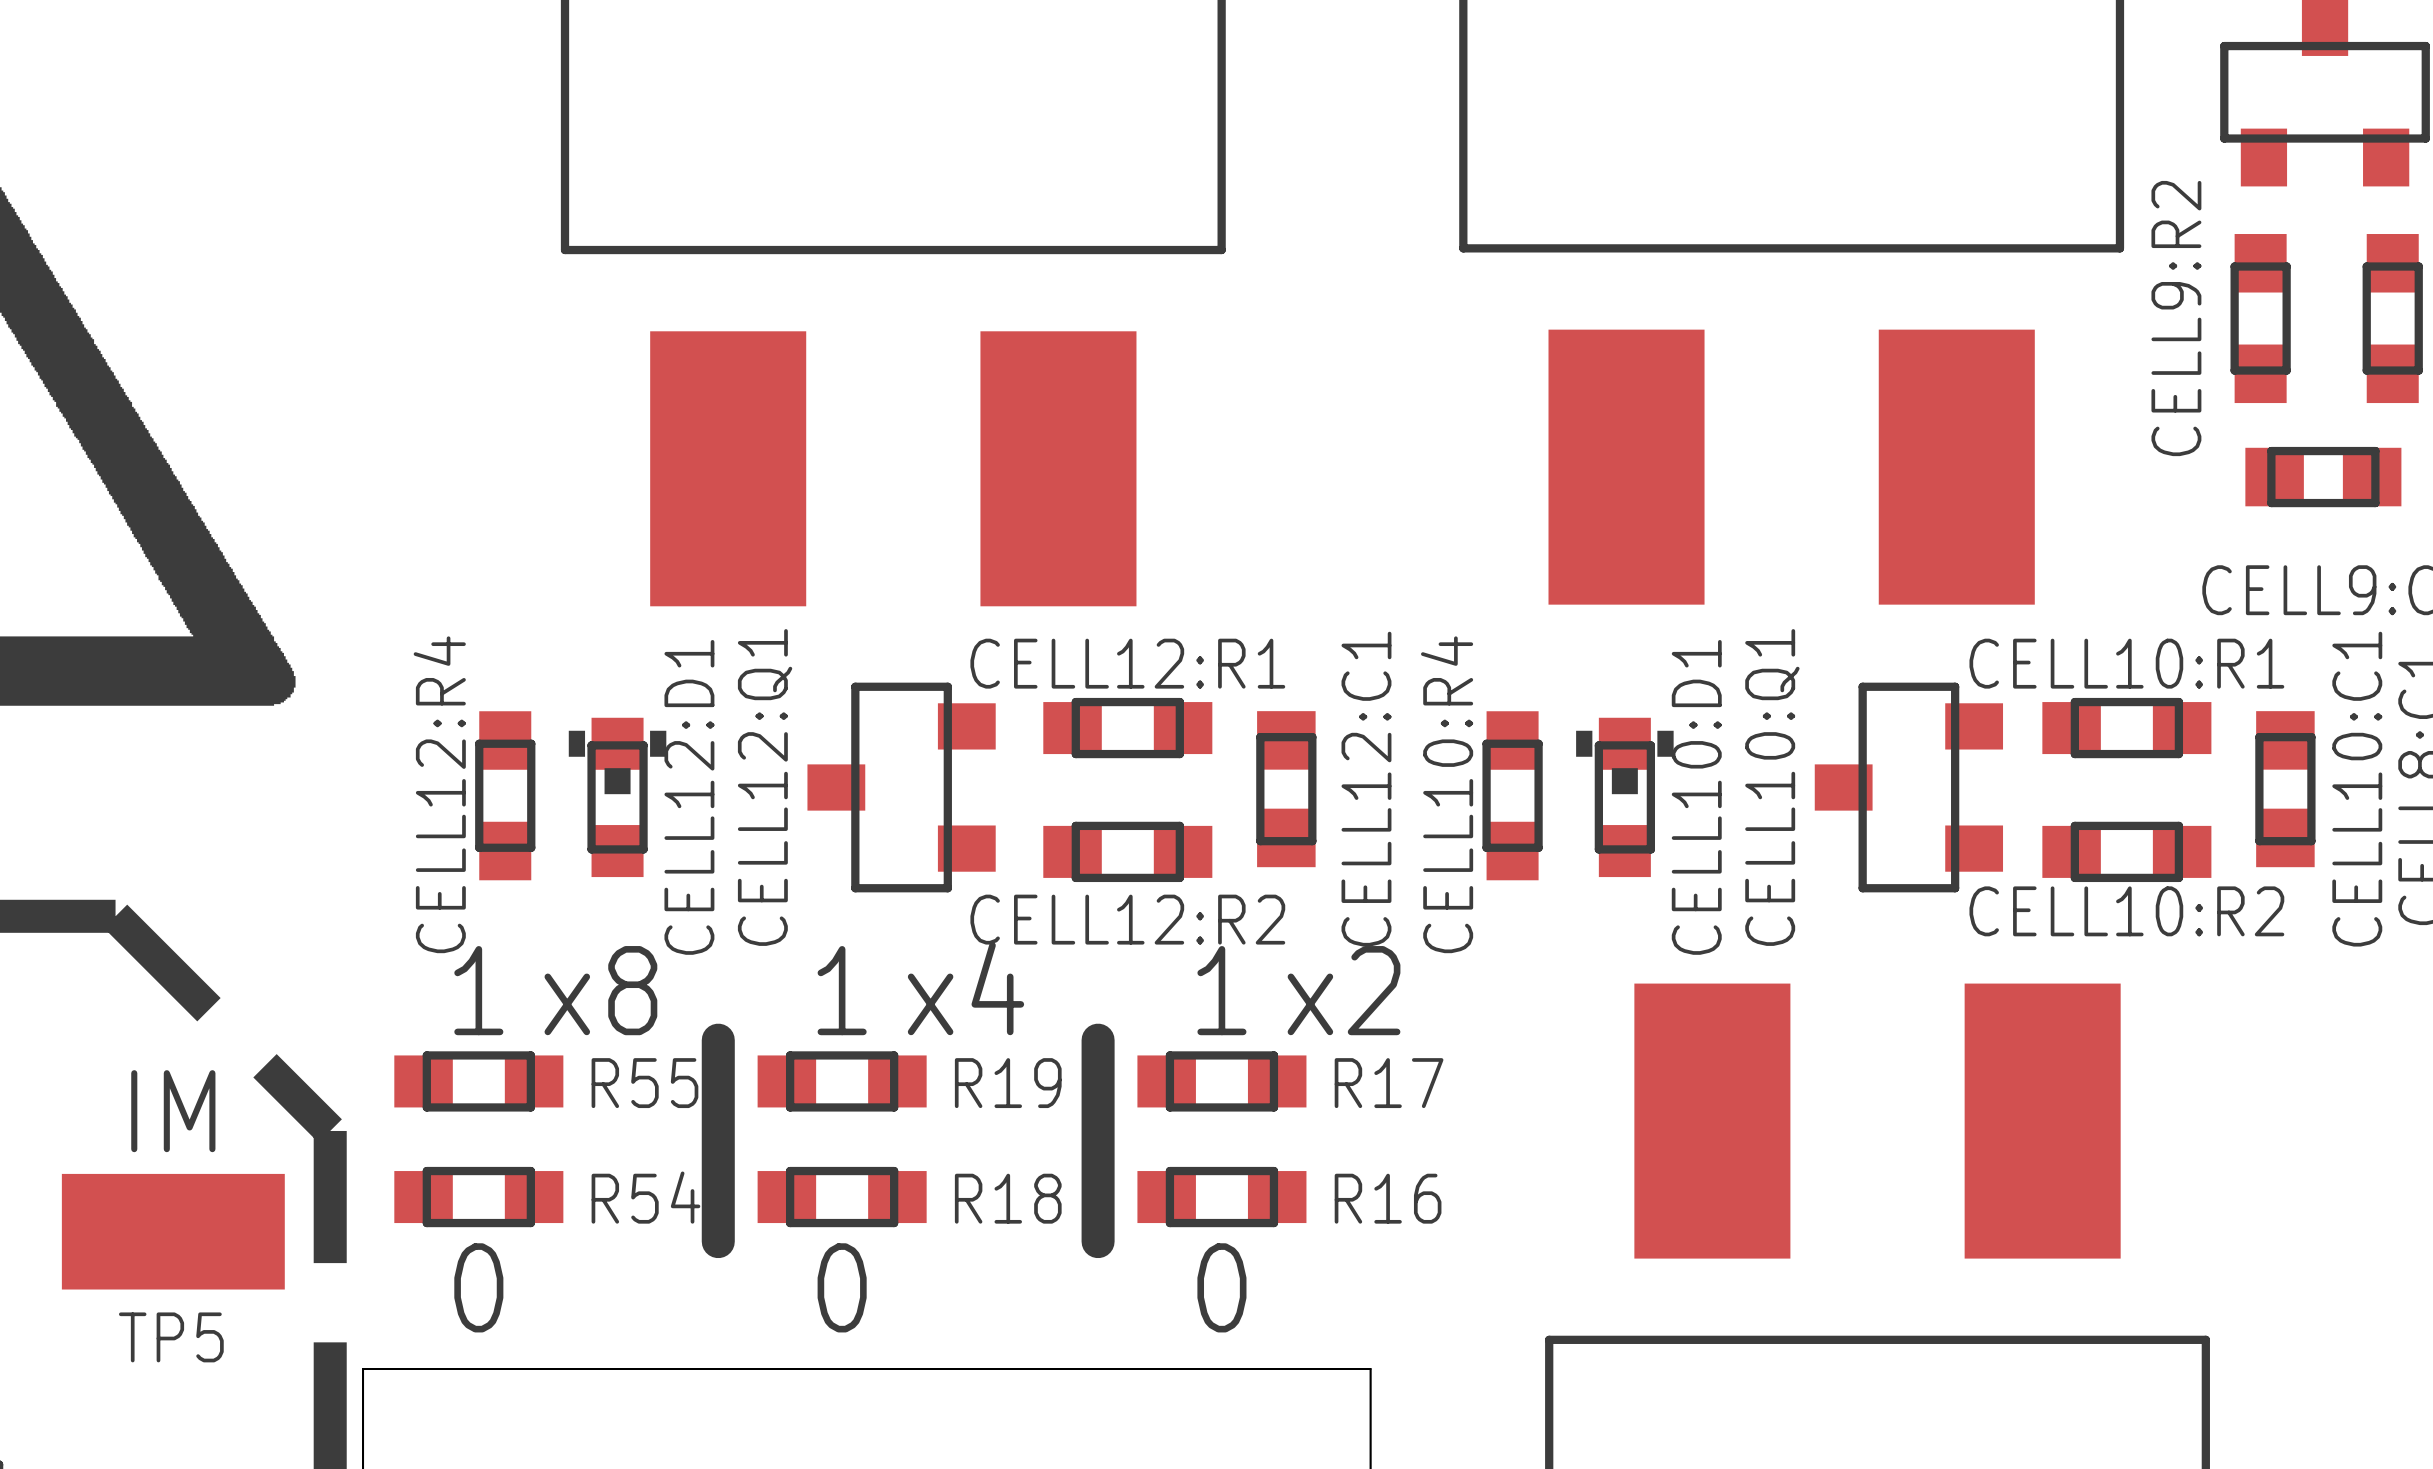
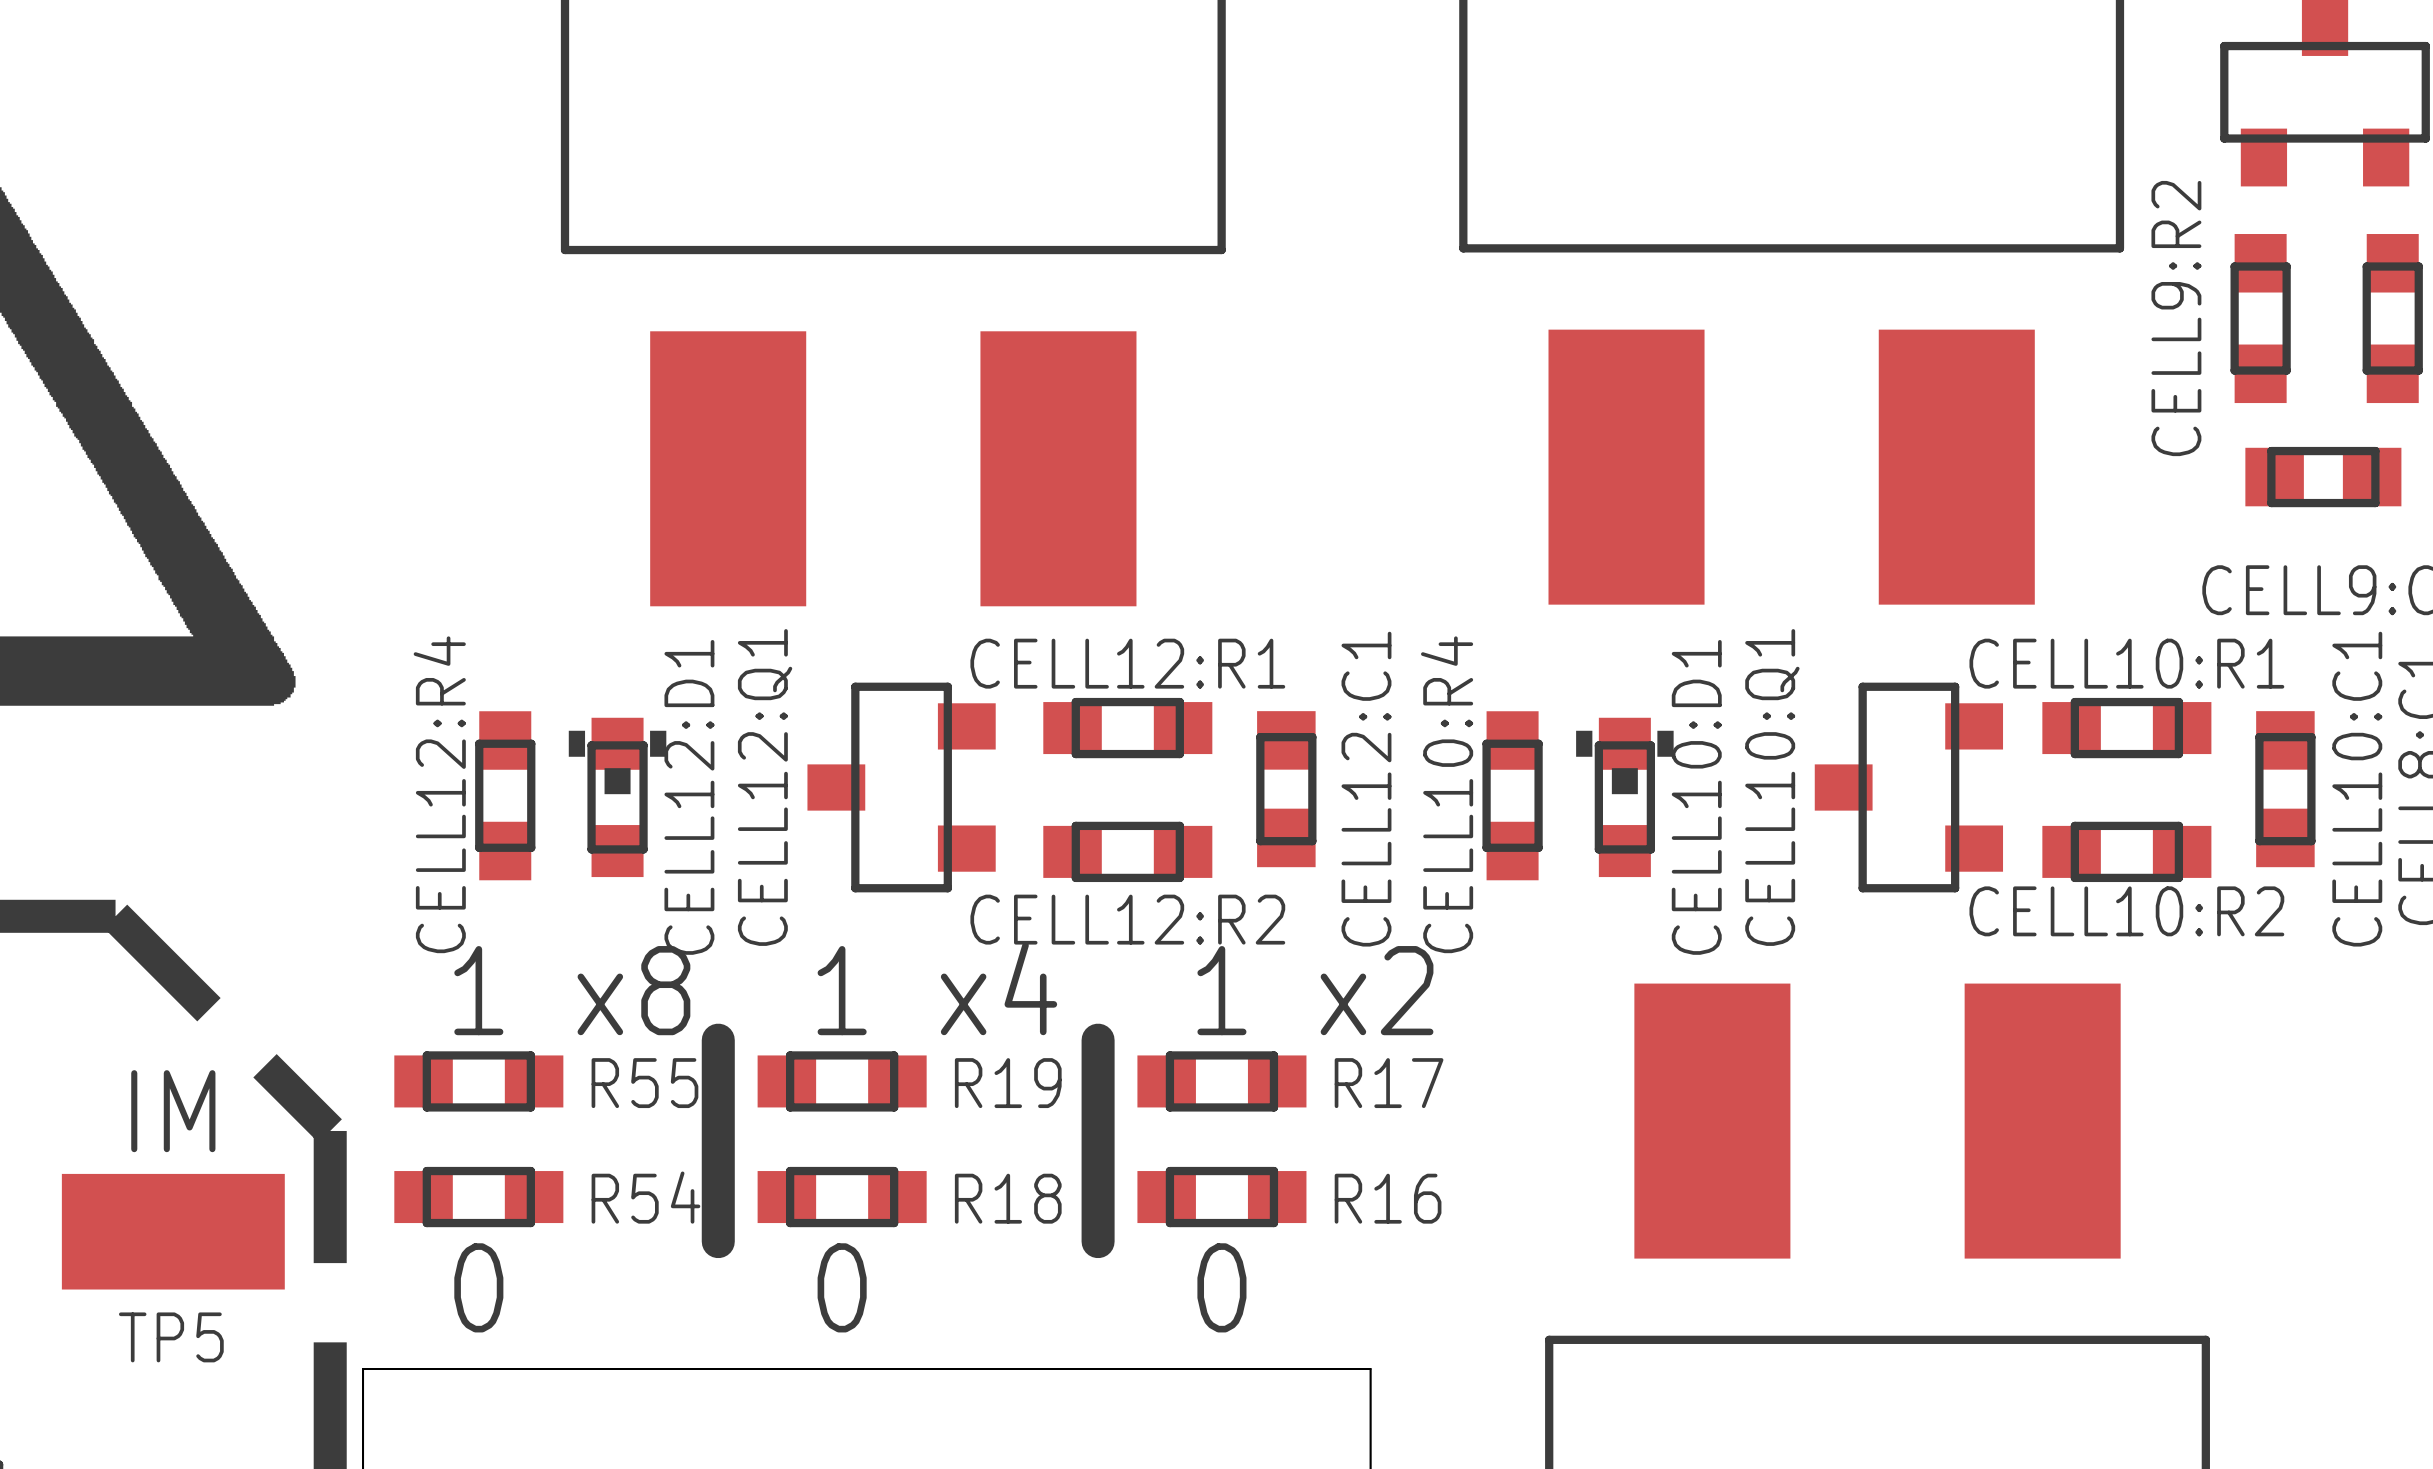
text position: x4 (965, 988) -> x4 (999, 988)
text position: x8 (600, 990) -> x8 (633, 990)
text position: x2 (1344, 990) -> x2 (1377, 990)

